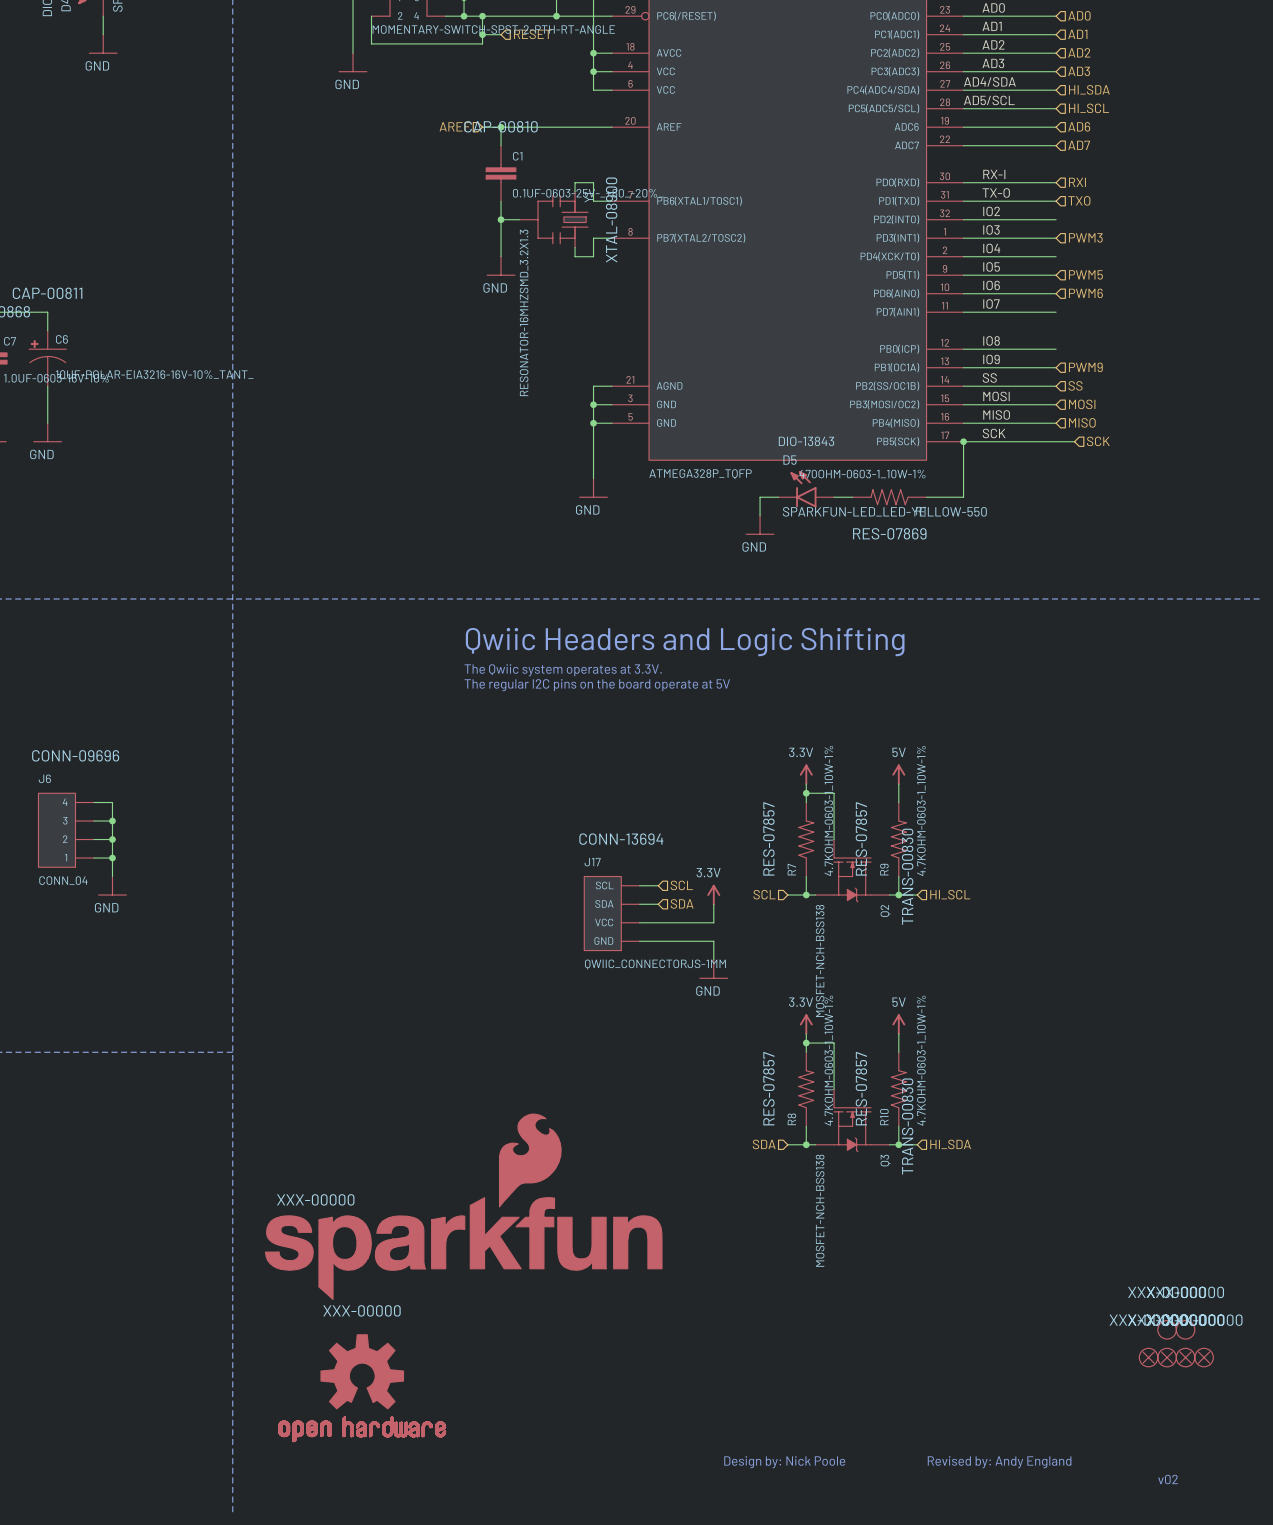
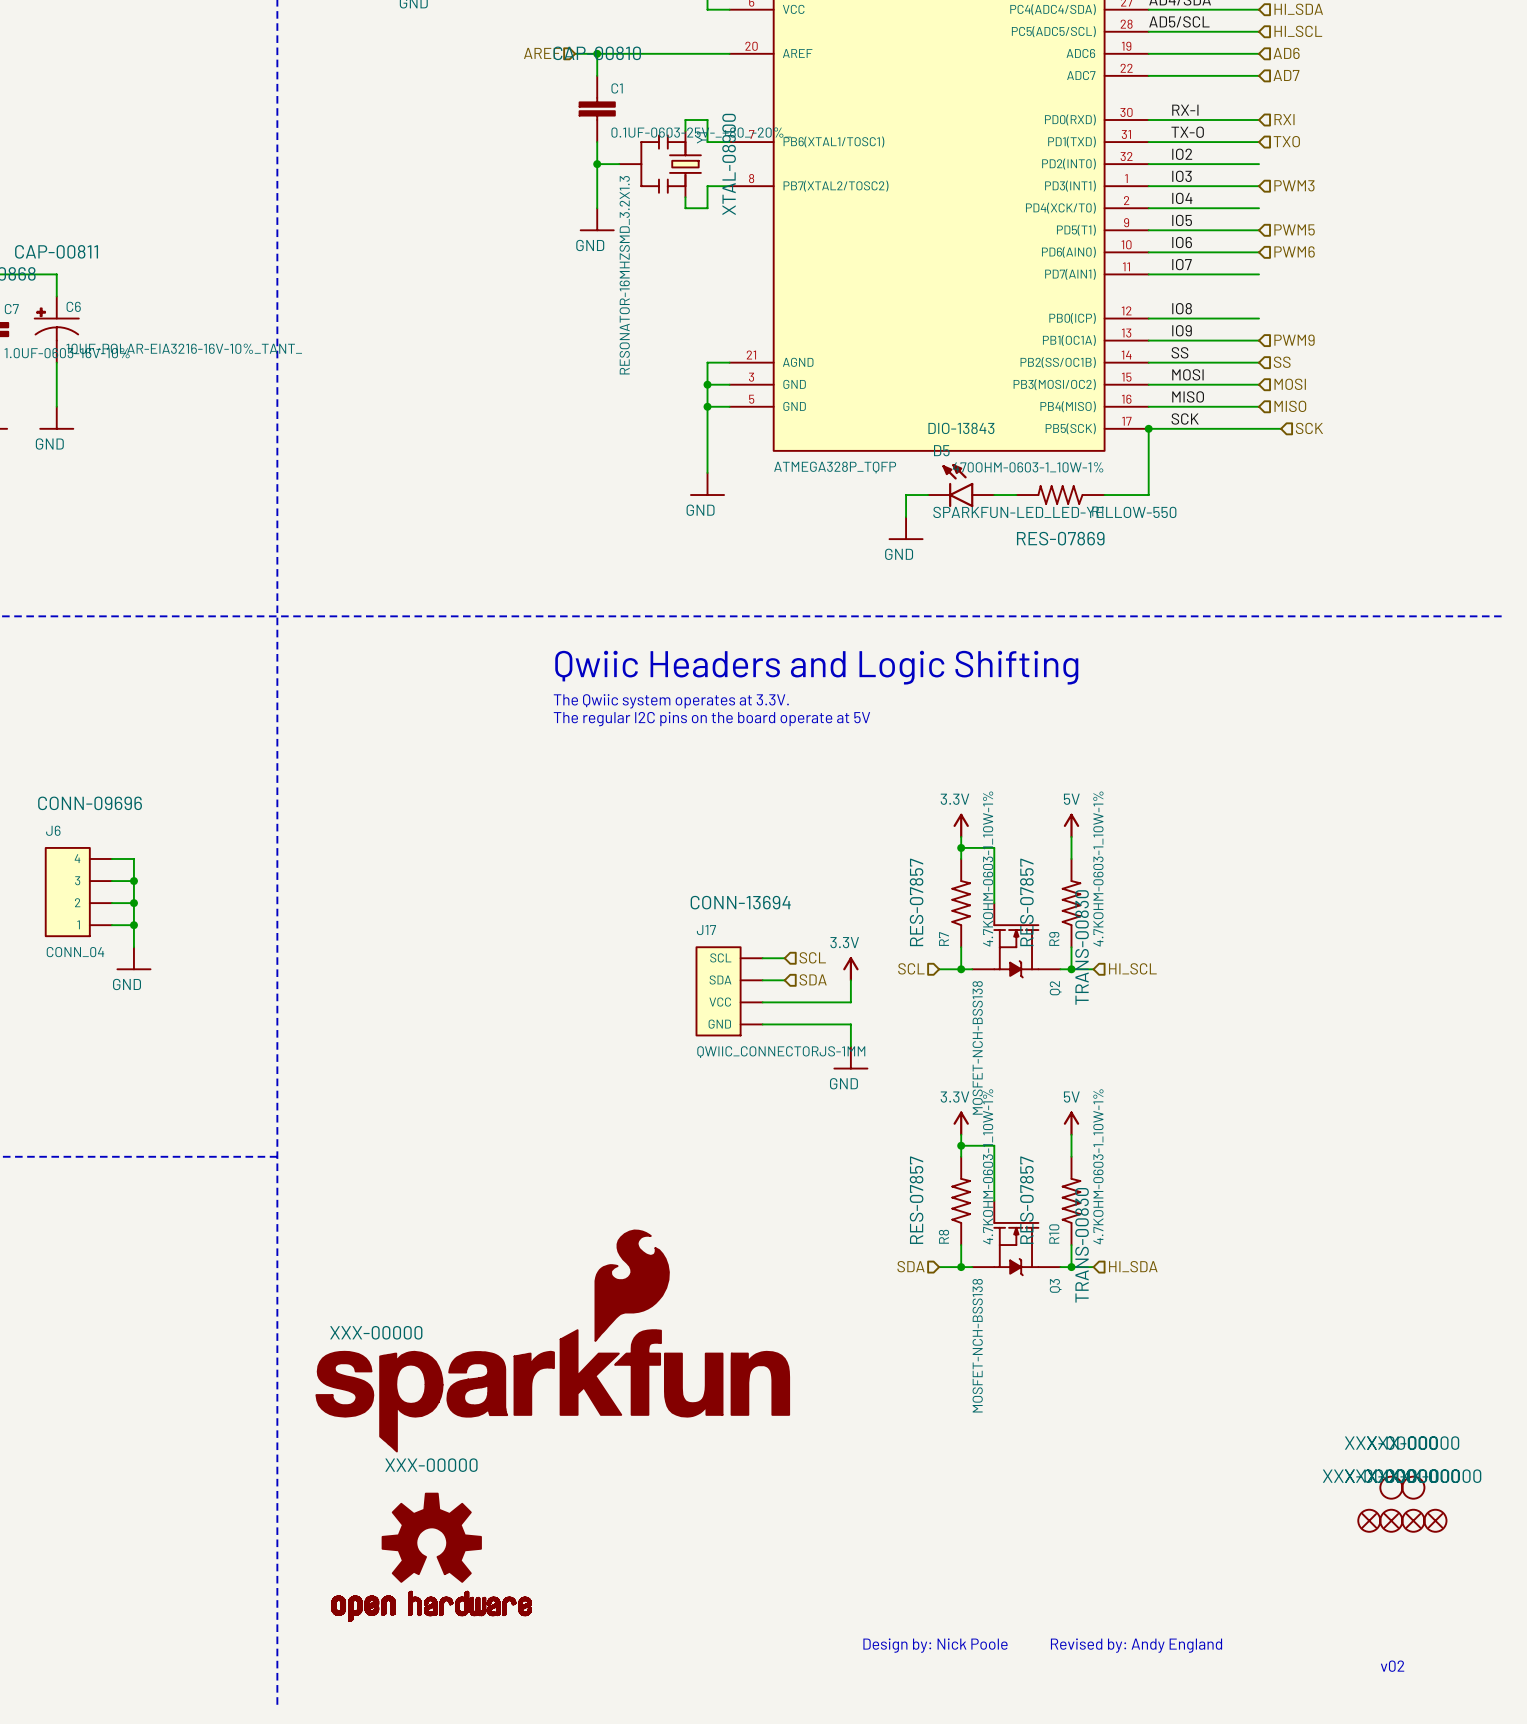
text position: Revised by: Andy England (999, 1462) -> Revised by: Andy England (1136, 1645)

